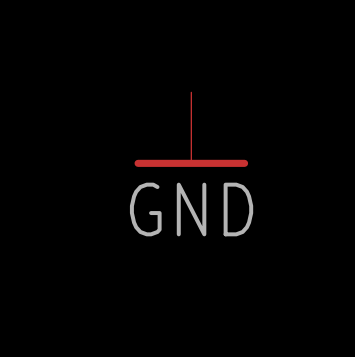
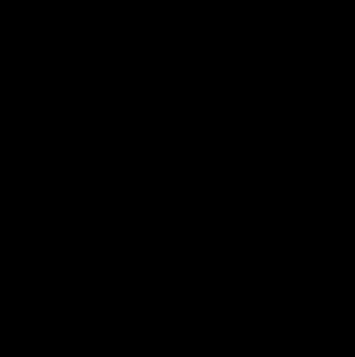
power symbol: GND (191, 129) -> none

